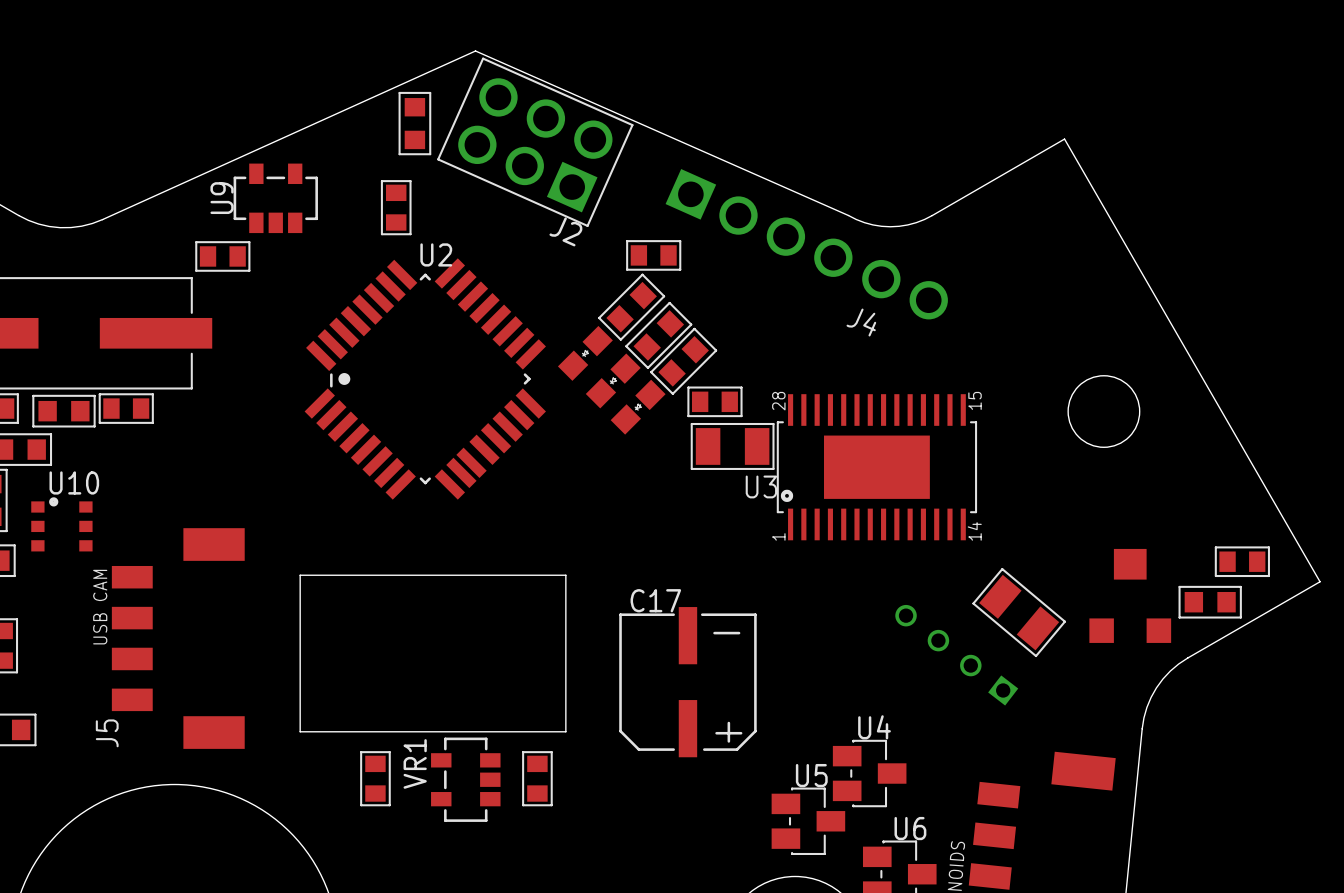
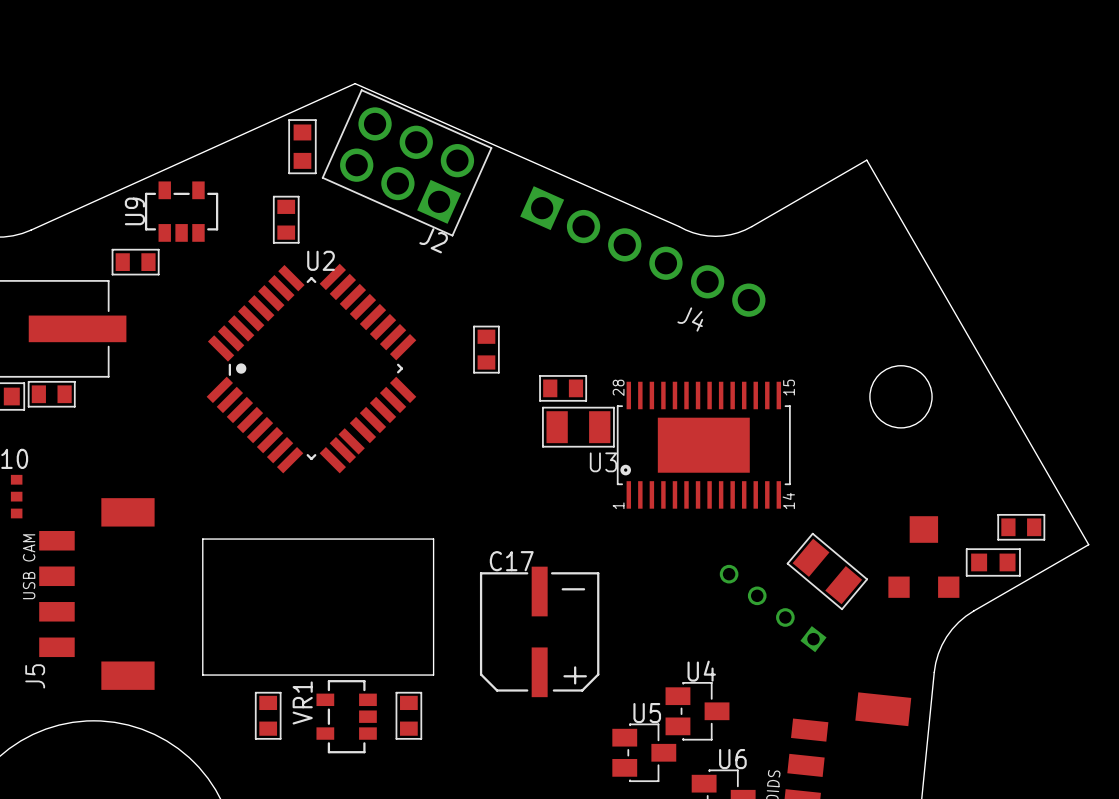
part rotation: 0° (653, 255) -> 90° clockwise (486, 349)
part position: (653, 255) -> (486, 349)
part: (631, 307) -> none
part: (658, 335) -> none
part: (585, 353) -> none
part: (683, 361) -> none
part: (613, 380) -> none
part: (638, 407) -> none

